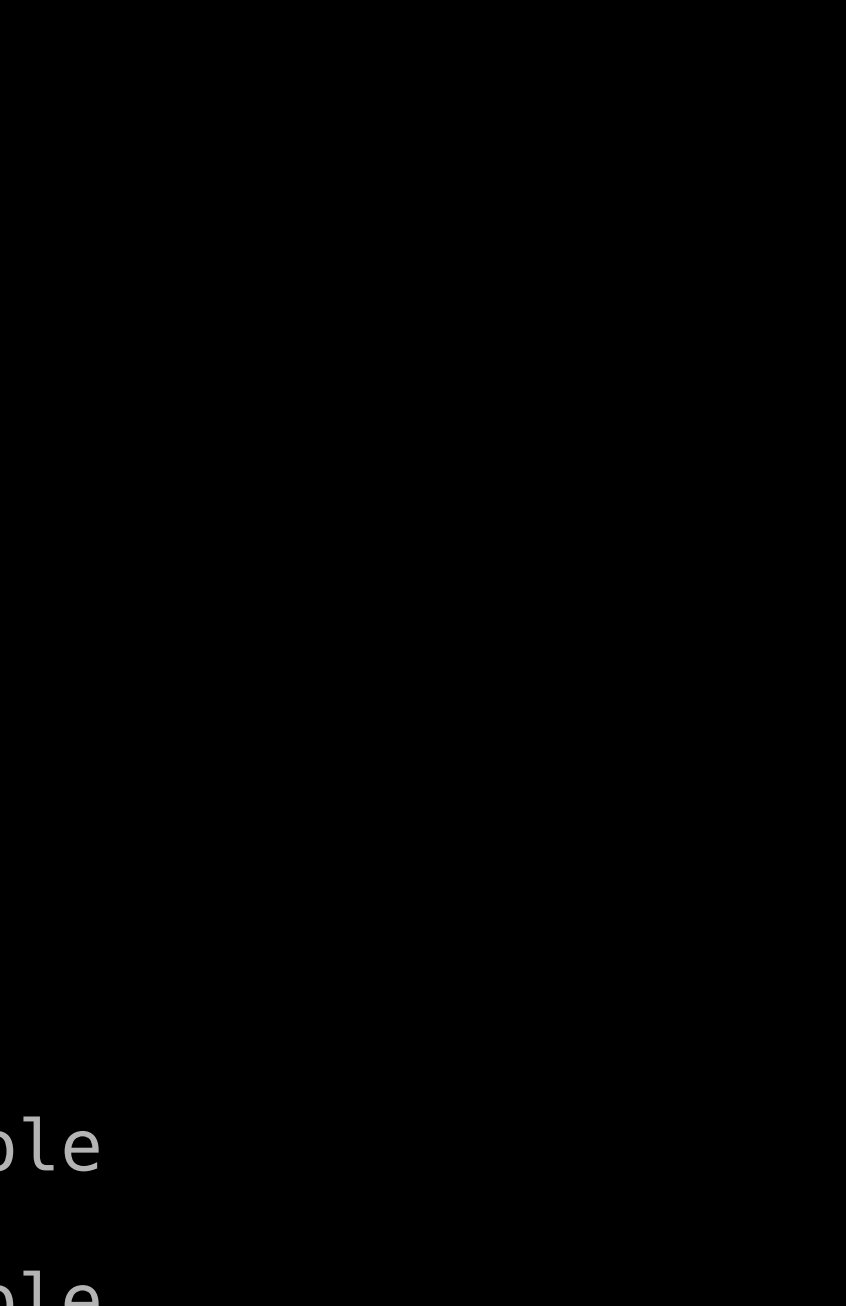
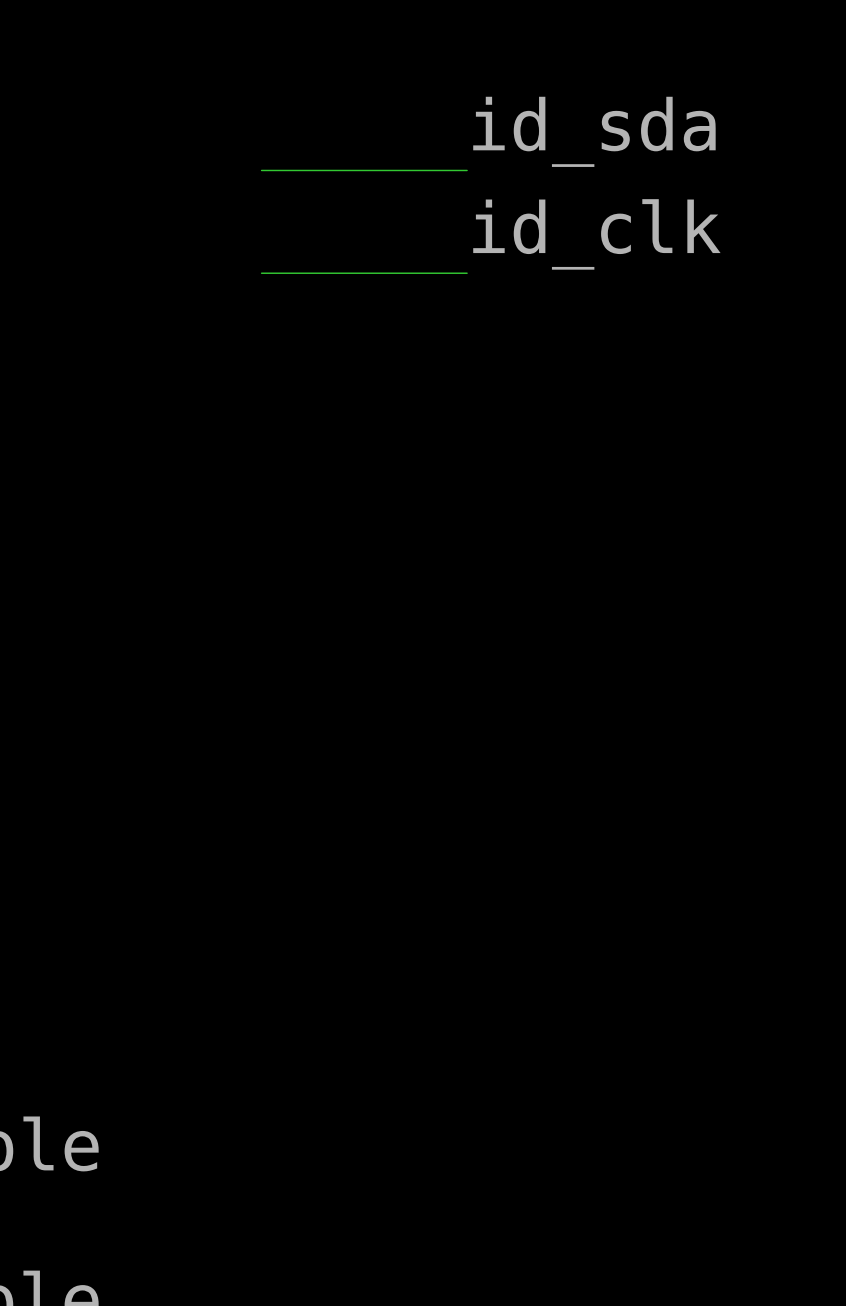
label: none -> id_sda (594, 131)
wire: none -> (261, 170) (467, 170)
label: none -> id_clk (596, 234)
wire: none -> (261, 273) (467, 273)

